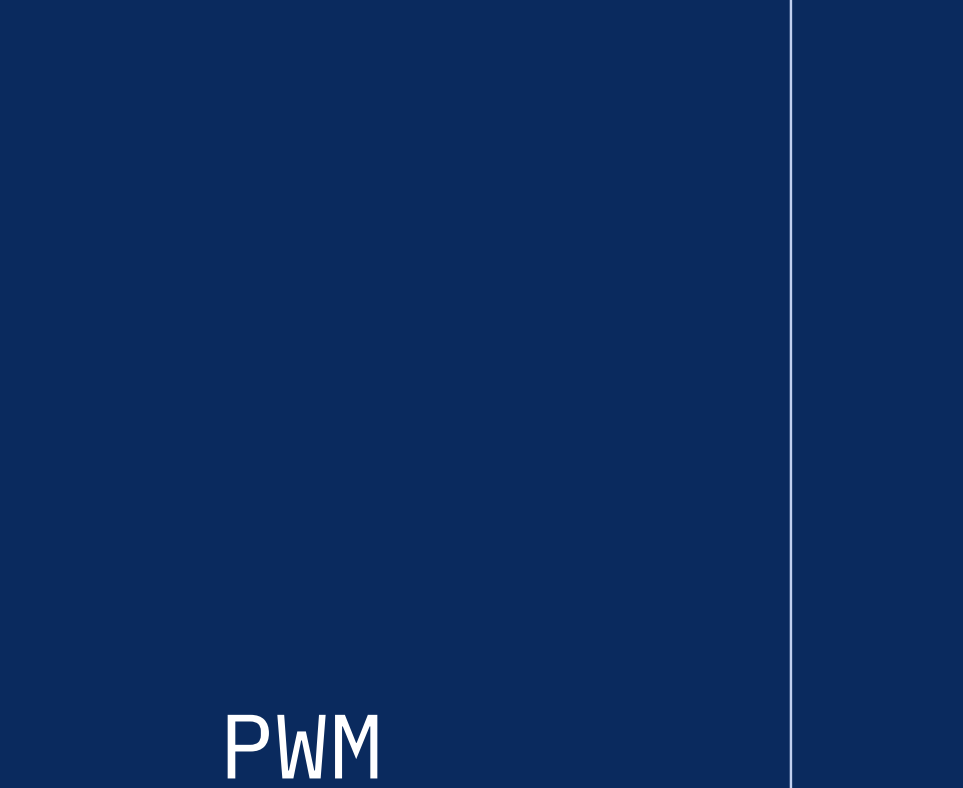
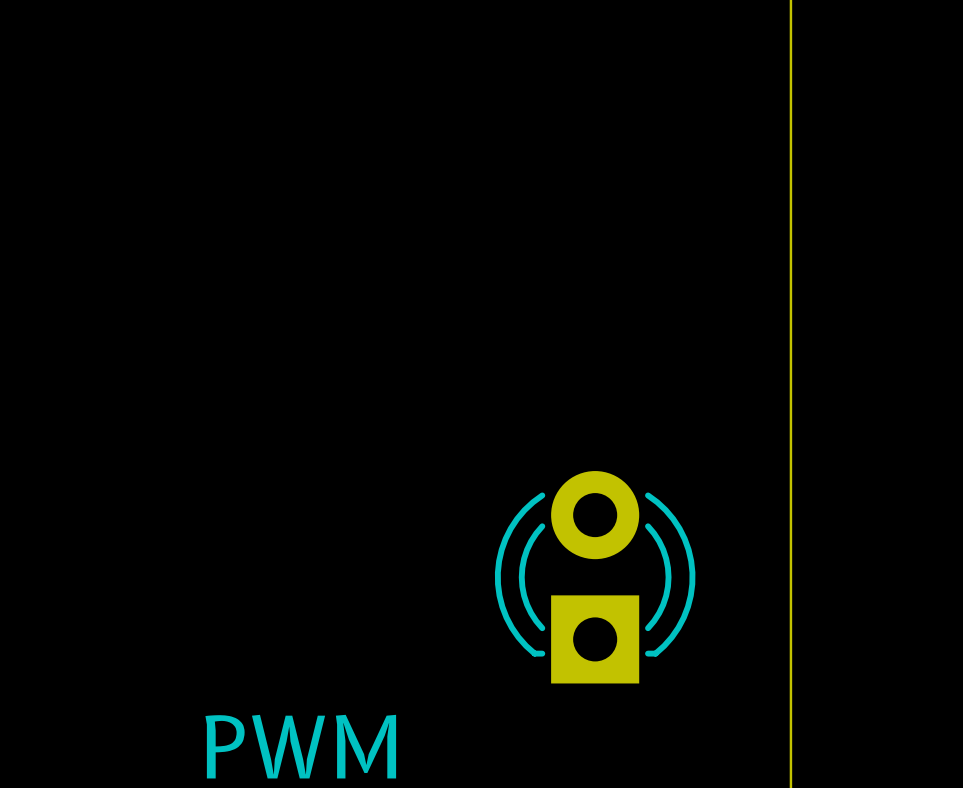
part: none -> (595, 577)

